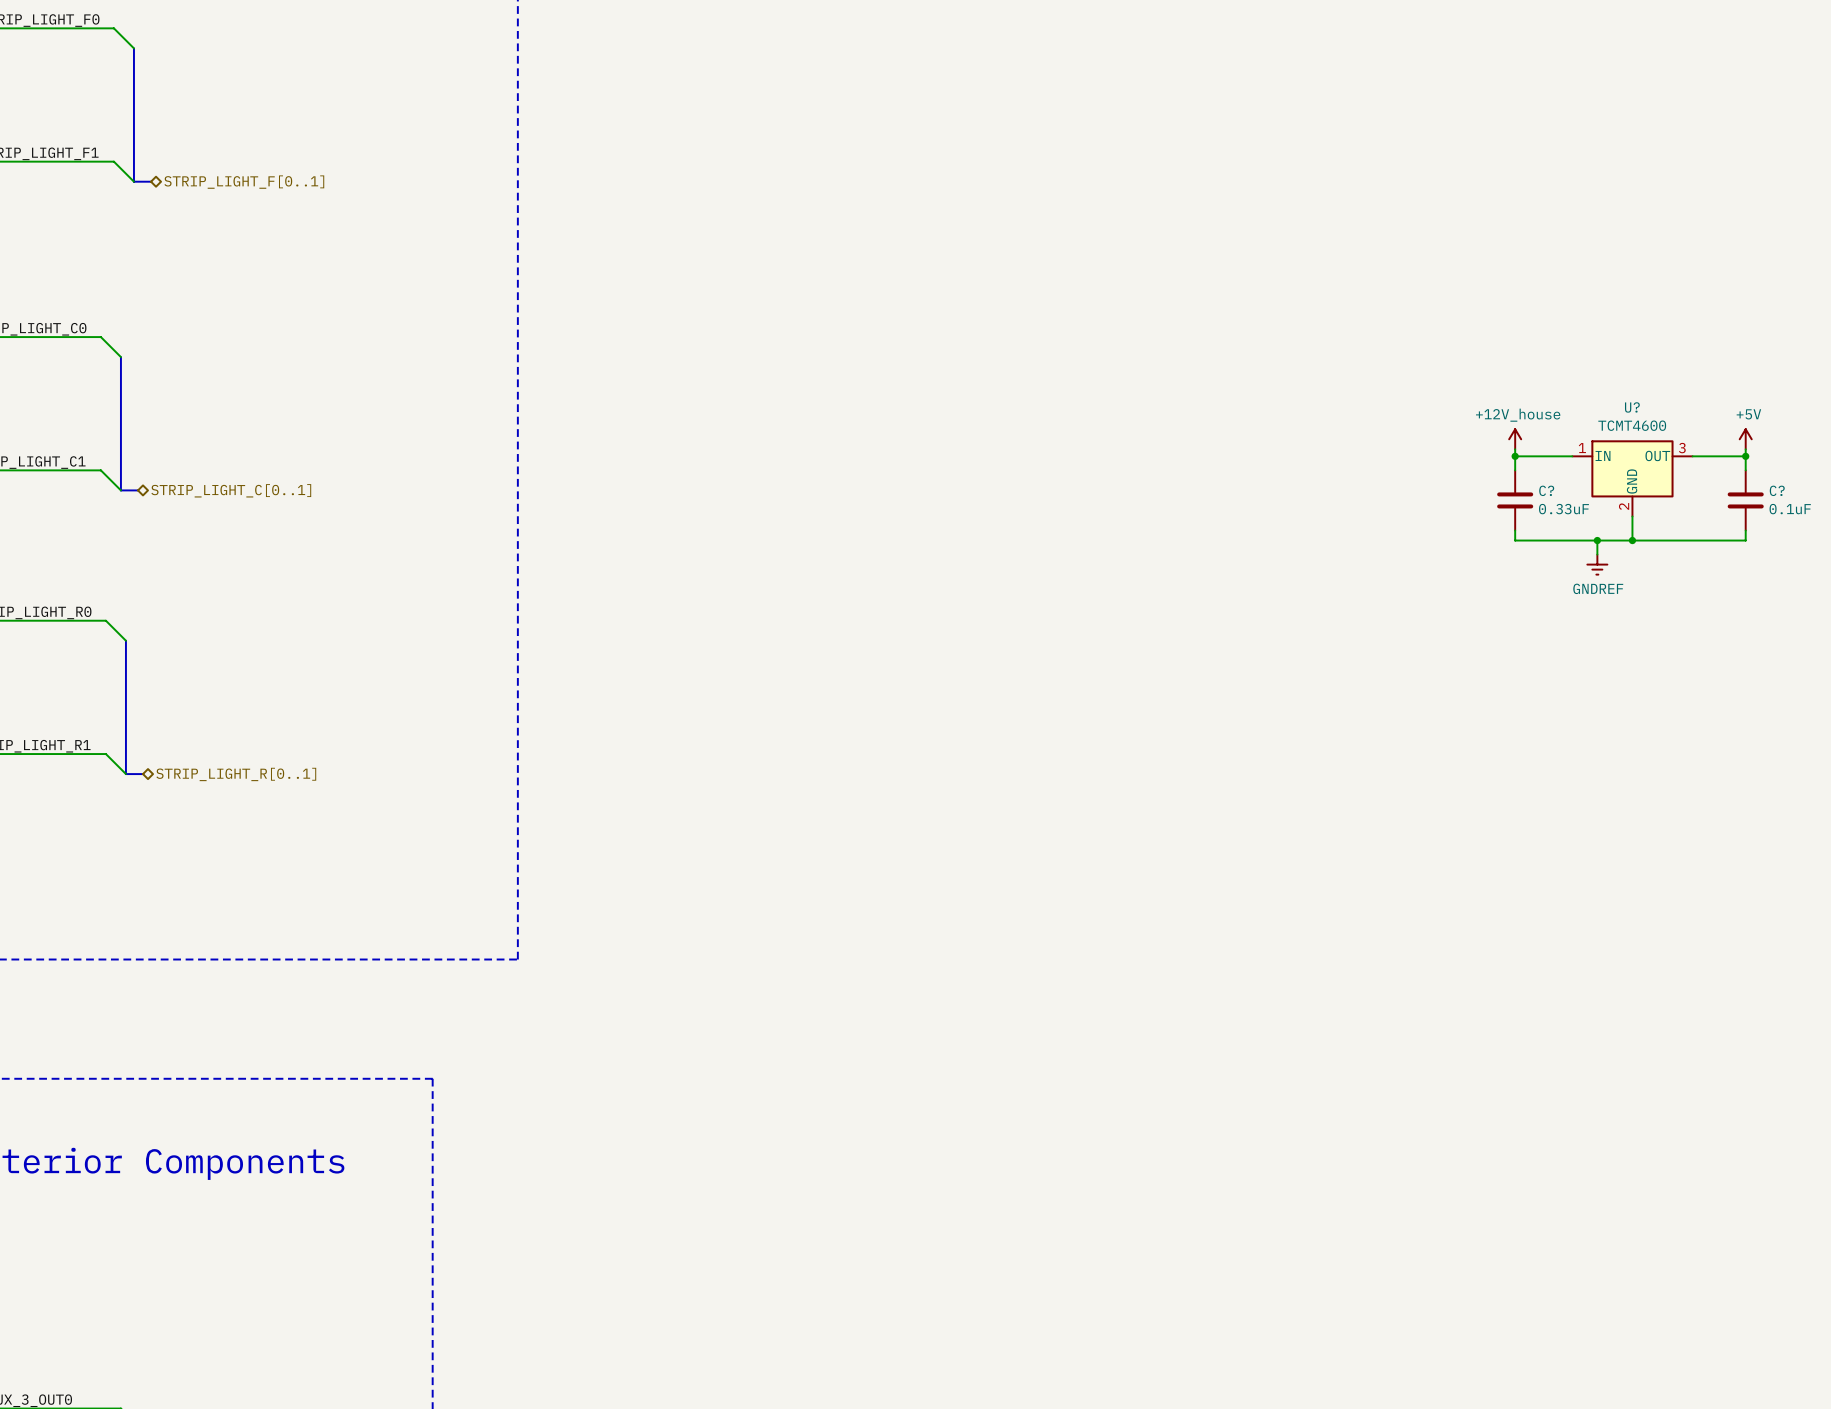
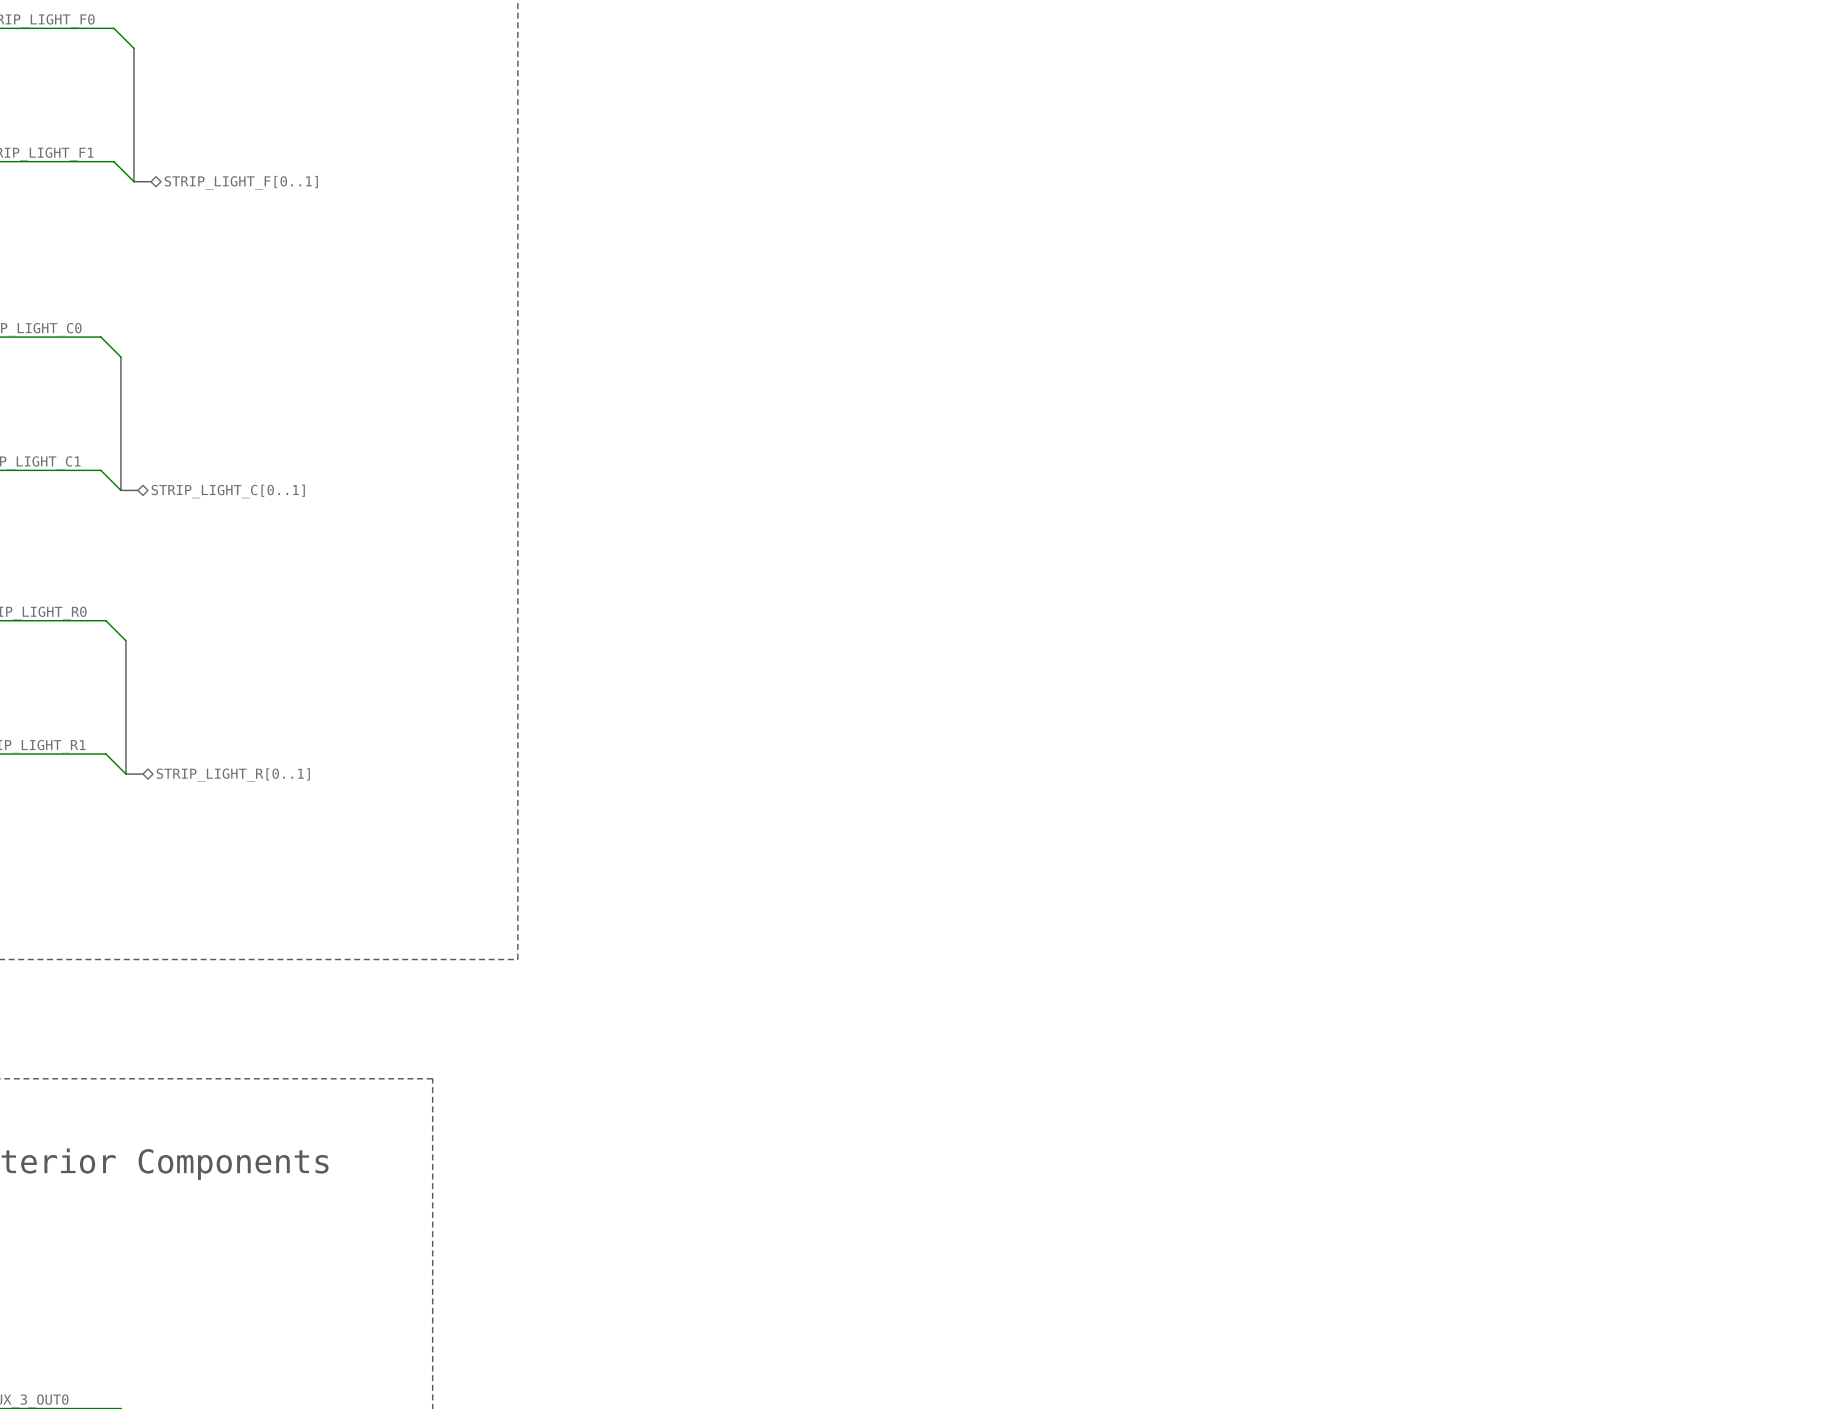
power symbol: +12V_house (1515, 439) -> none
power symbol: +5V (1745, 439) -> none
wire: (1515, 449) (1515, 470) -> none
wire: (1745, 449) (1745, 470) -> none
wire: (1515, 456) (1572, 456) -> none
junction: (1515, 456) -> none
wire: (1692, 456) (1745, 456) -> none
junction: (1745, 456) -> none
U?: TCMT4600 (1632, 478) -> none
C?: 0.33uF (1515, 500) -> none
C?: 0.1uF (1745, 500) -> none
wire: (1632, 516) (1632, 540) -> none
wire: (1515, 530) (1515, 540) (1745, 540) (1745, 530) -> none
wire: (1597, 540) (1597, 554) -> none
junction: (1597, 540) -> none
junction: (1632, 540) -> none
power symbol: GNDREF (1597, 564) -> none

